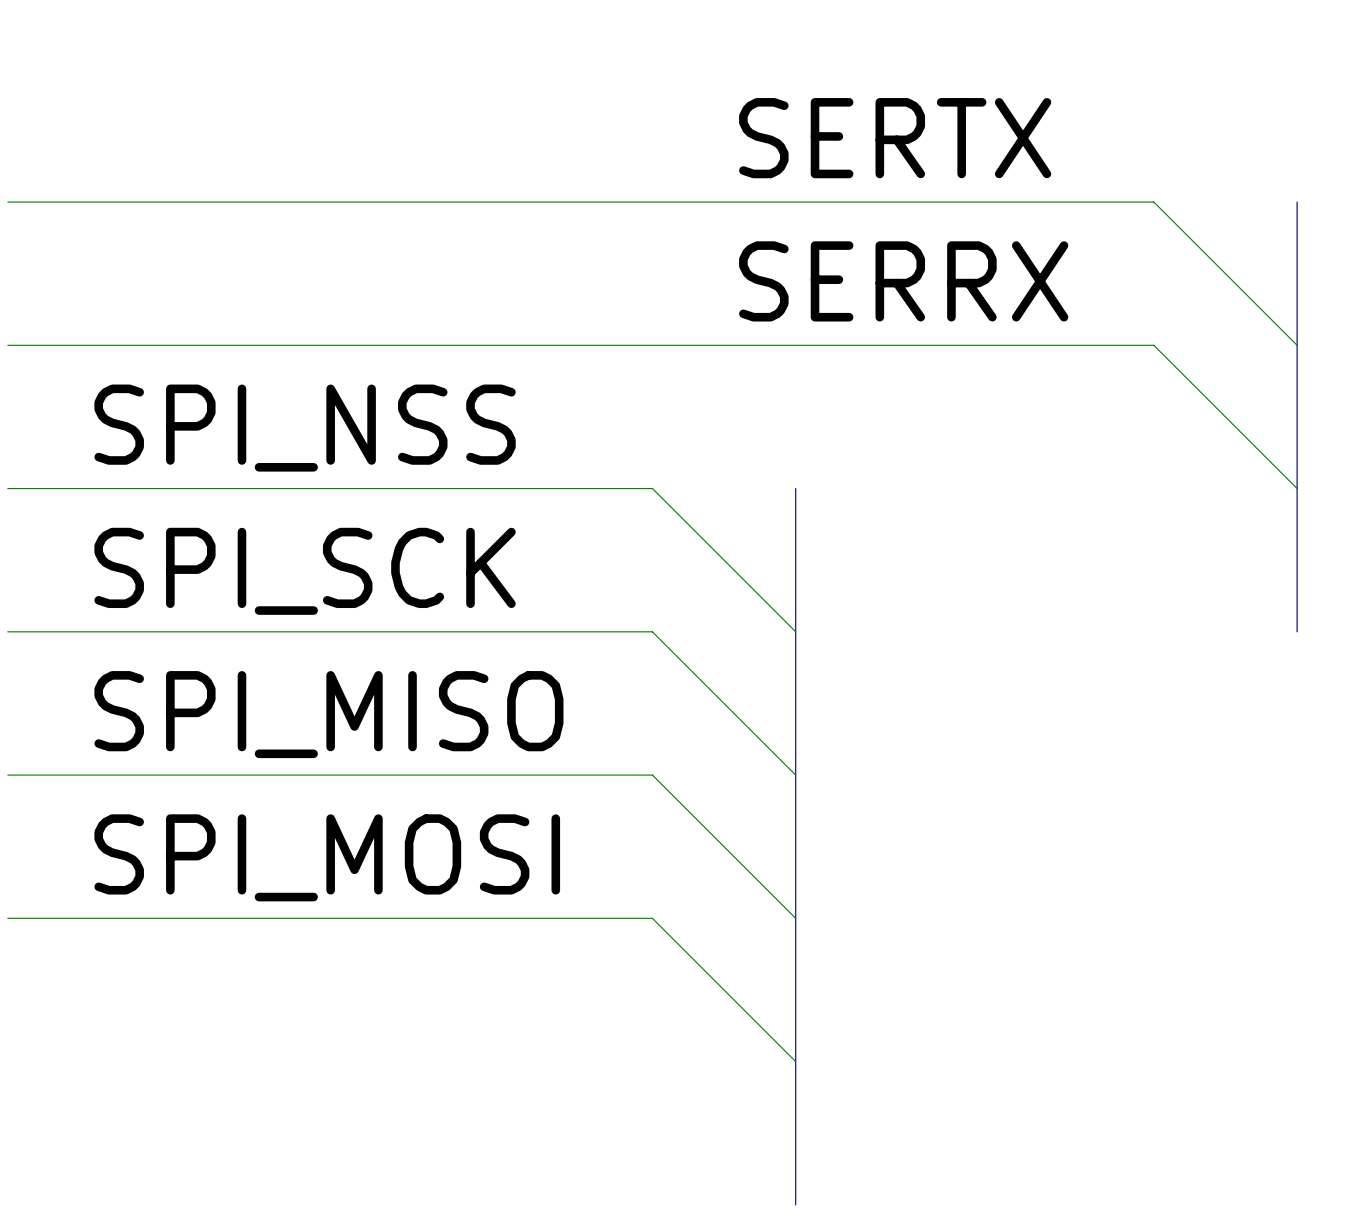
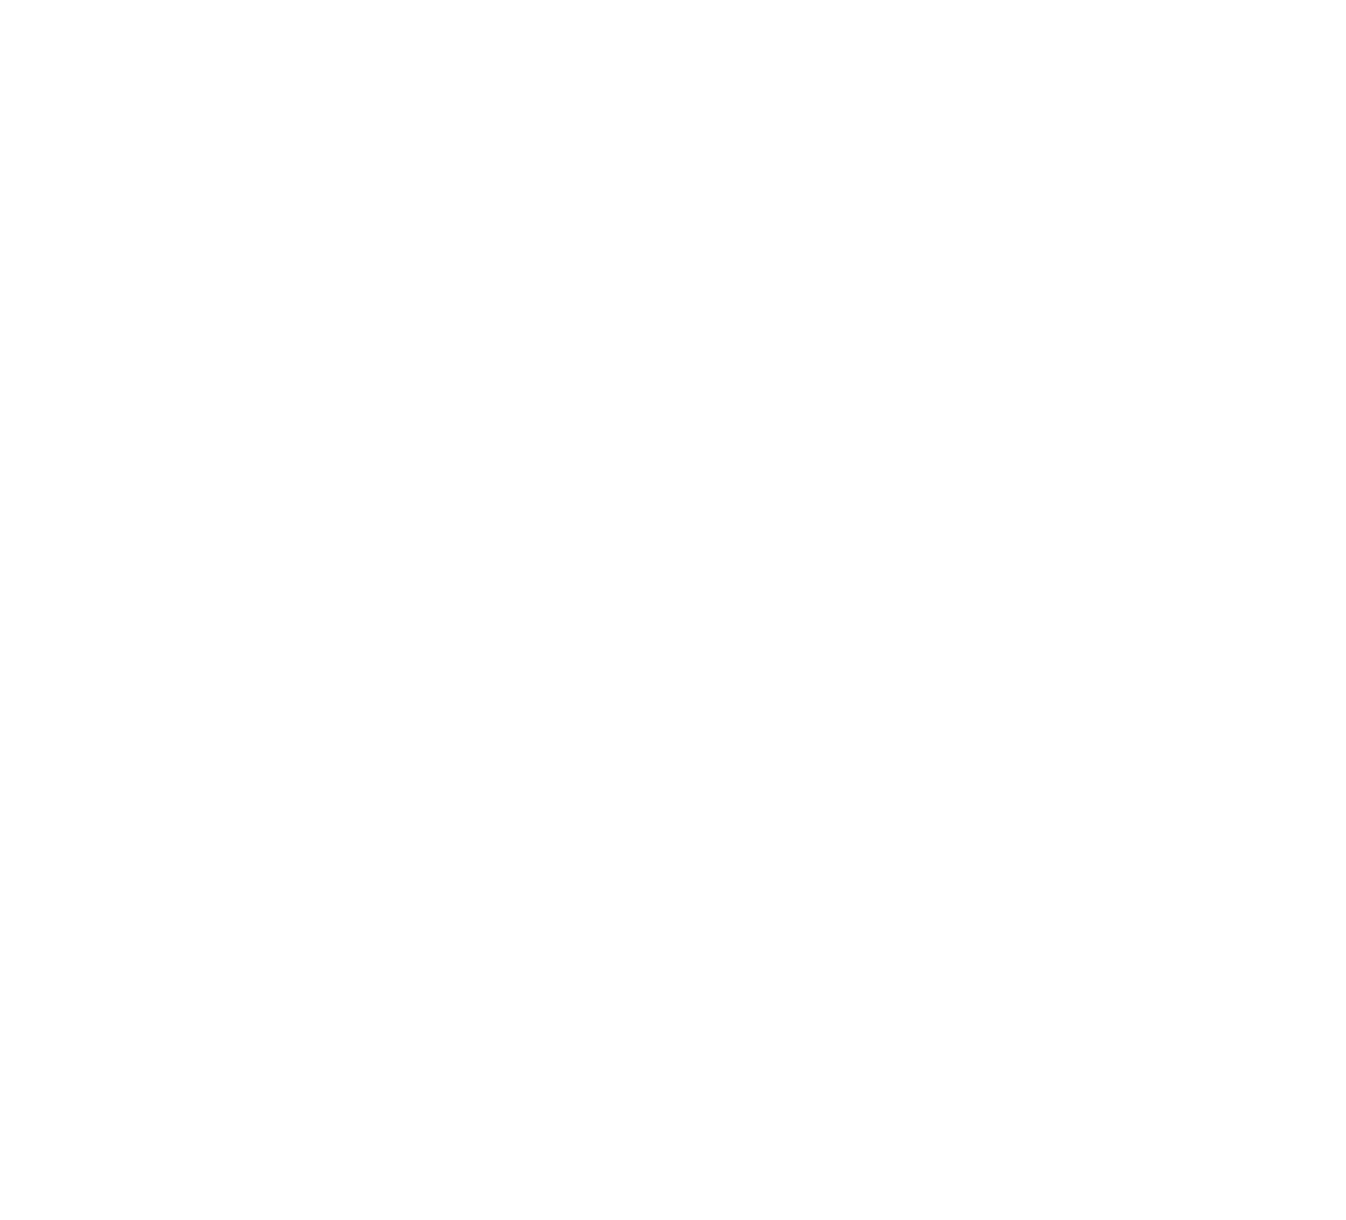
label: SERTX (895, 138) -> none
wire: (7, 202) (1153, 202) (1297, 345) -> none
bus: (1297, 202) (1297, 631) -> none
label: SERRX (903, 281) -> none
wire: (7, 345) (1153, 345) (1297, 488) -> none
label: SPI_NSS (305, 428) -> none
wire: (7, 488) (652, 488) (795, 631) -> none
bus: (795, 488) (795, 1204) -> none
label: SPI_SCK (305, 571) -> none
wire: (7, 631) (652, 631) (795, 775) -> none
label: SPI_MISO (328, 714) -> none
wire: (7, 775) (652, 775) (795, 918) -> none
label: SPI_MOSI (327, 857) -> none
wire: (7, 918) (652, 918) (795, 1061) -> none

